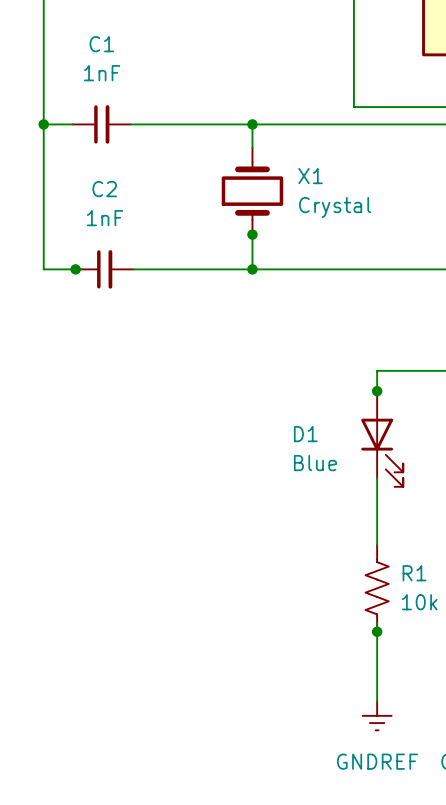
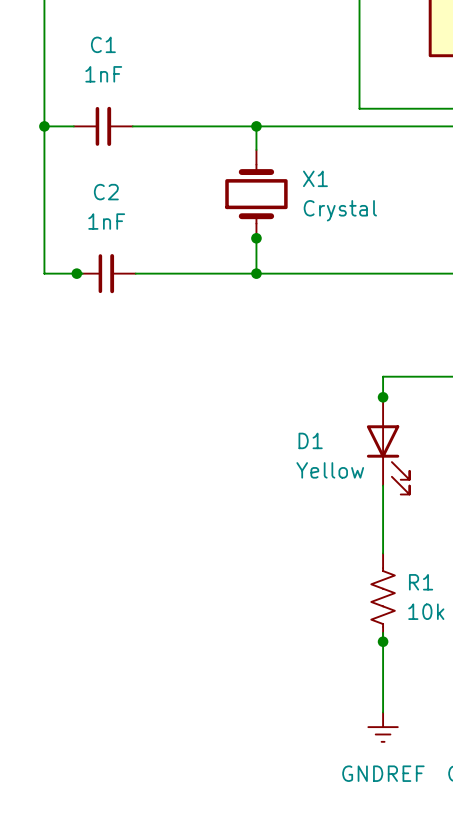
D1 value: Blue (315, 463) -> Yellow (330, 470)

